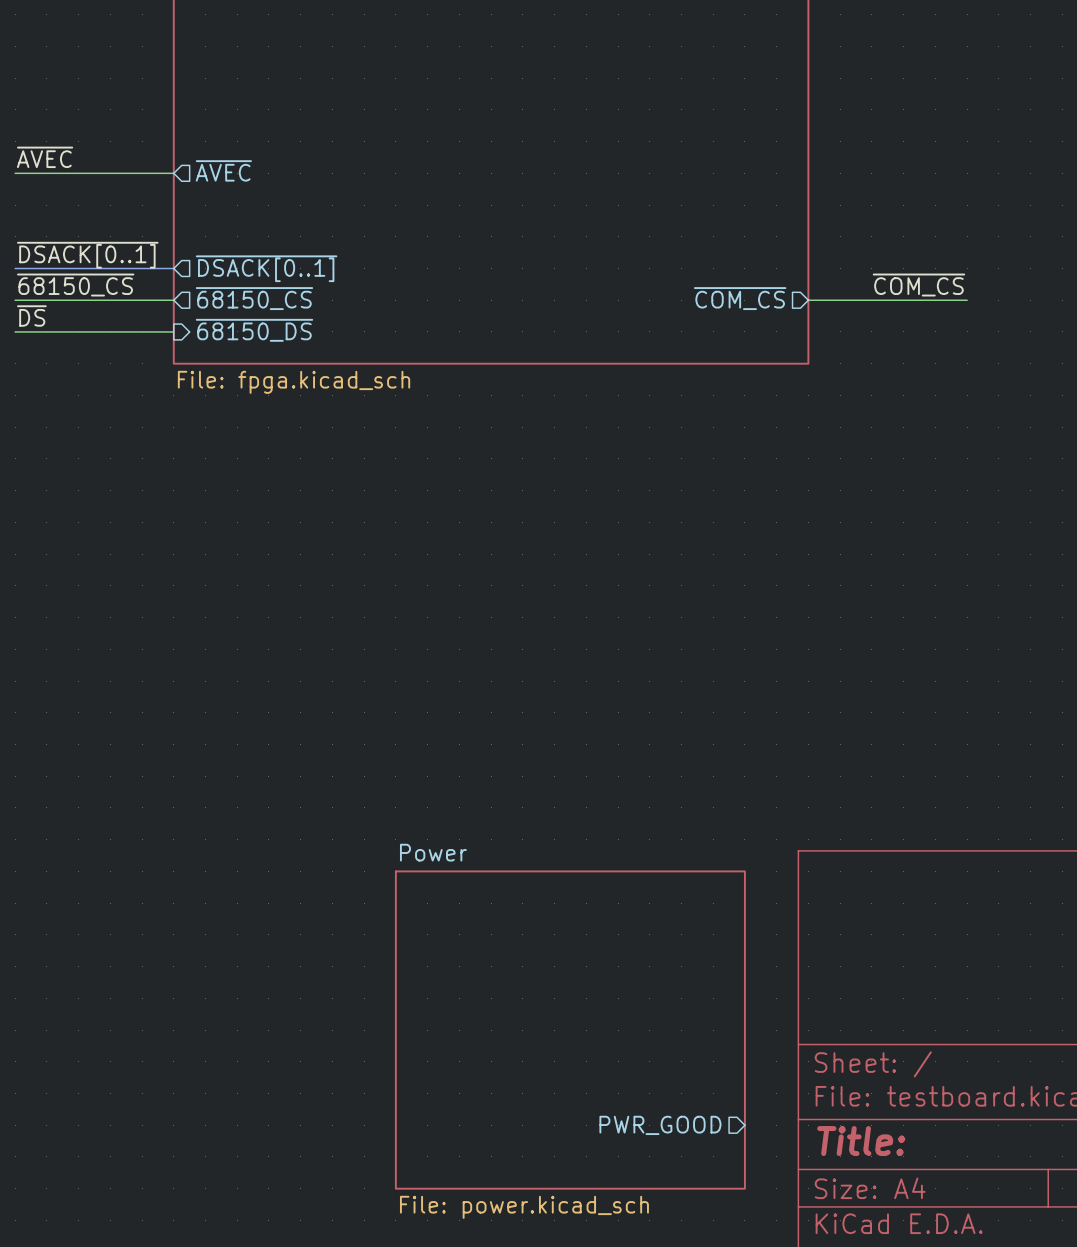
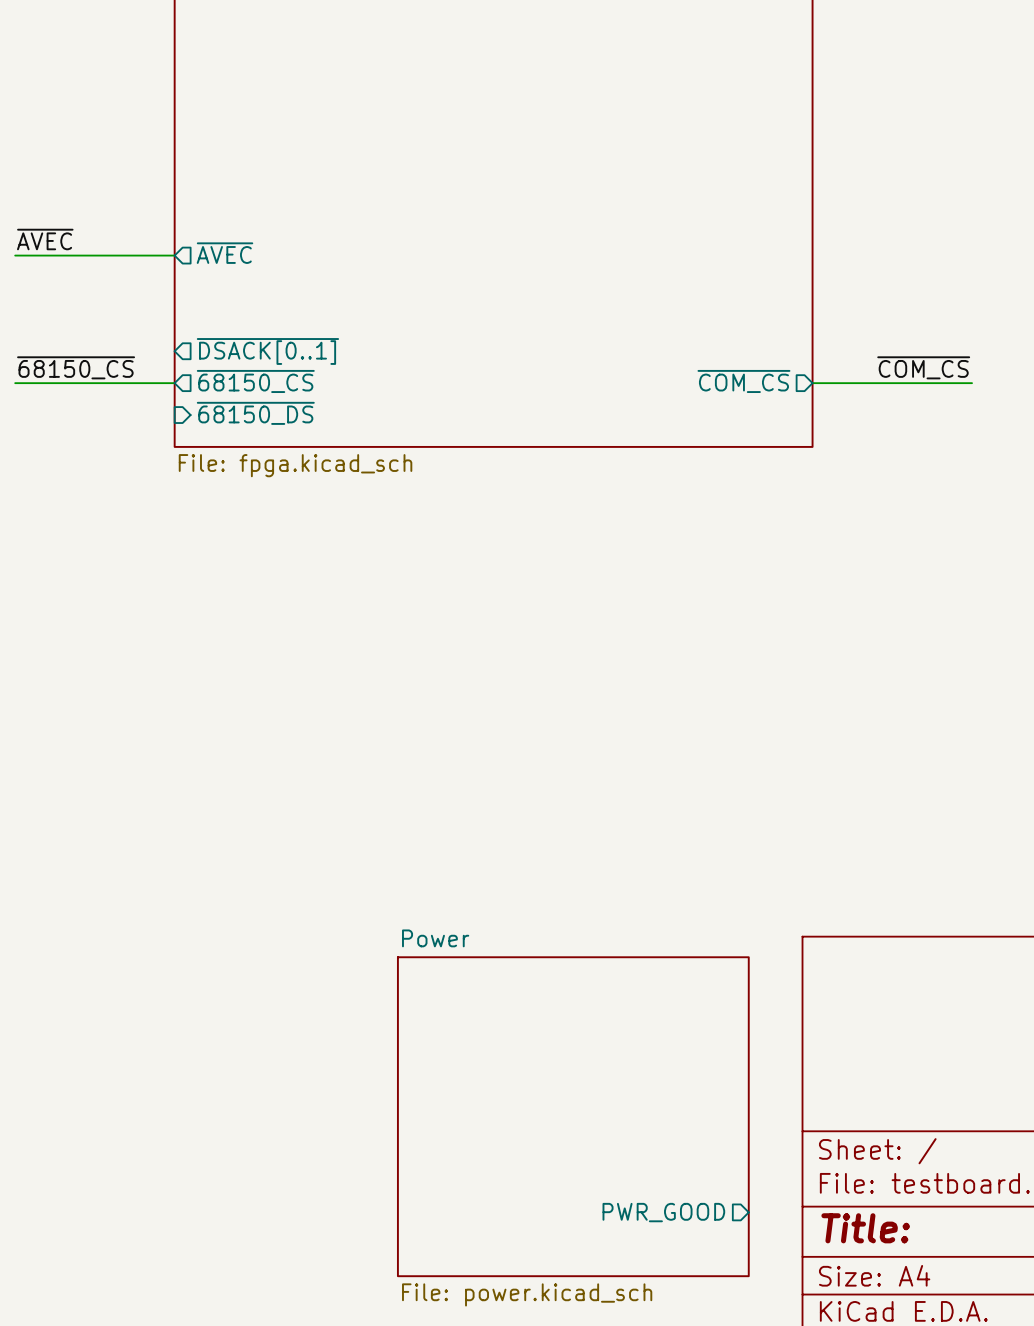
label: ~{DSACK[0..1]} (87, 255) -> none
bus: (15, 268) (173, 268) -> none
label: ~{DS} (31, 315) -> none
wire: (15, 331) (173, 331) -> none

